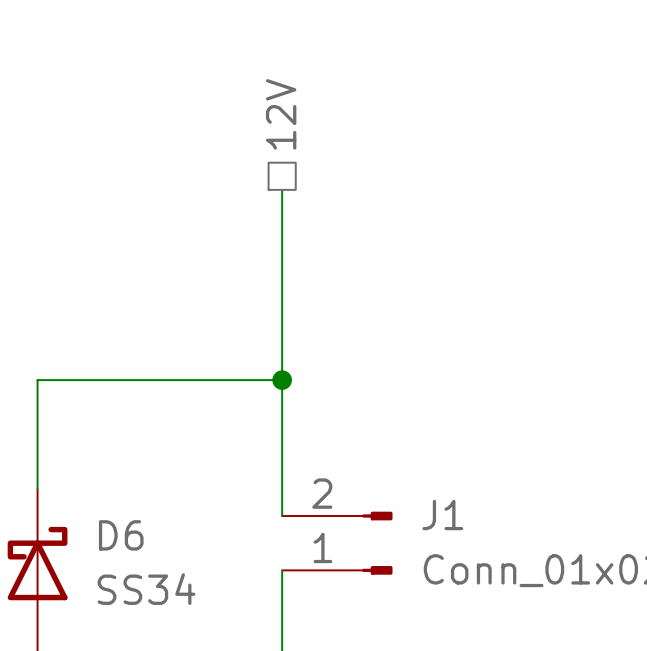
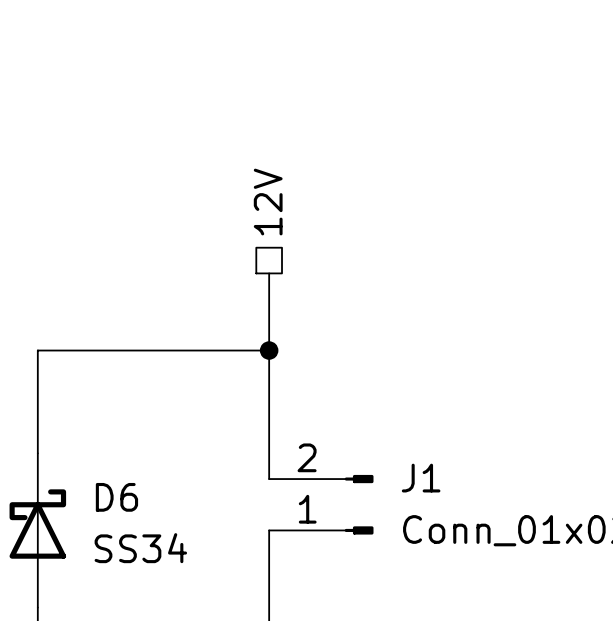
hierarchical label position: 12V (281, 114) -> 12V (268, 202)
wire: (282, 189) (282, 298) -> none

